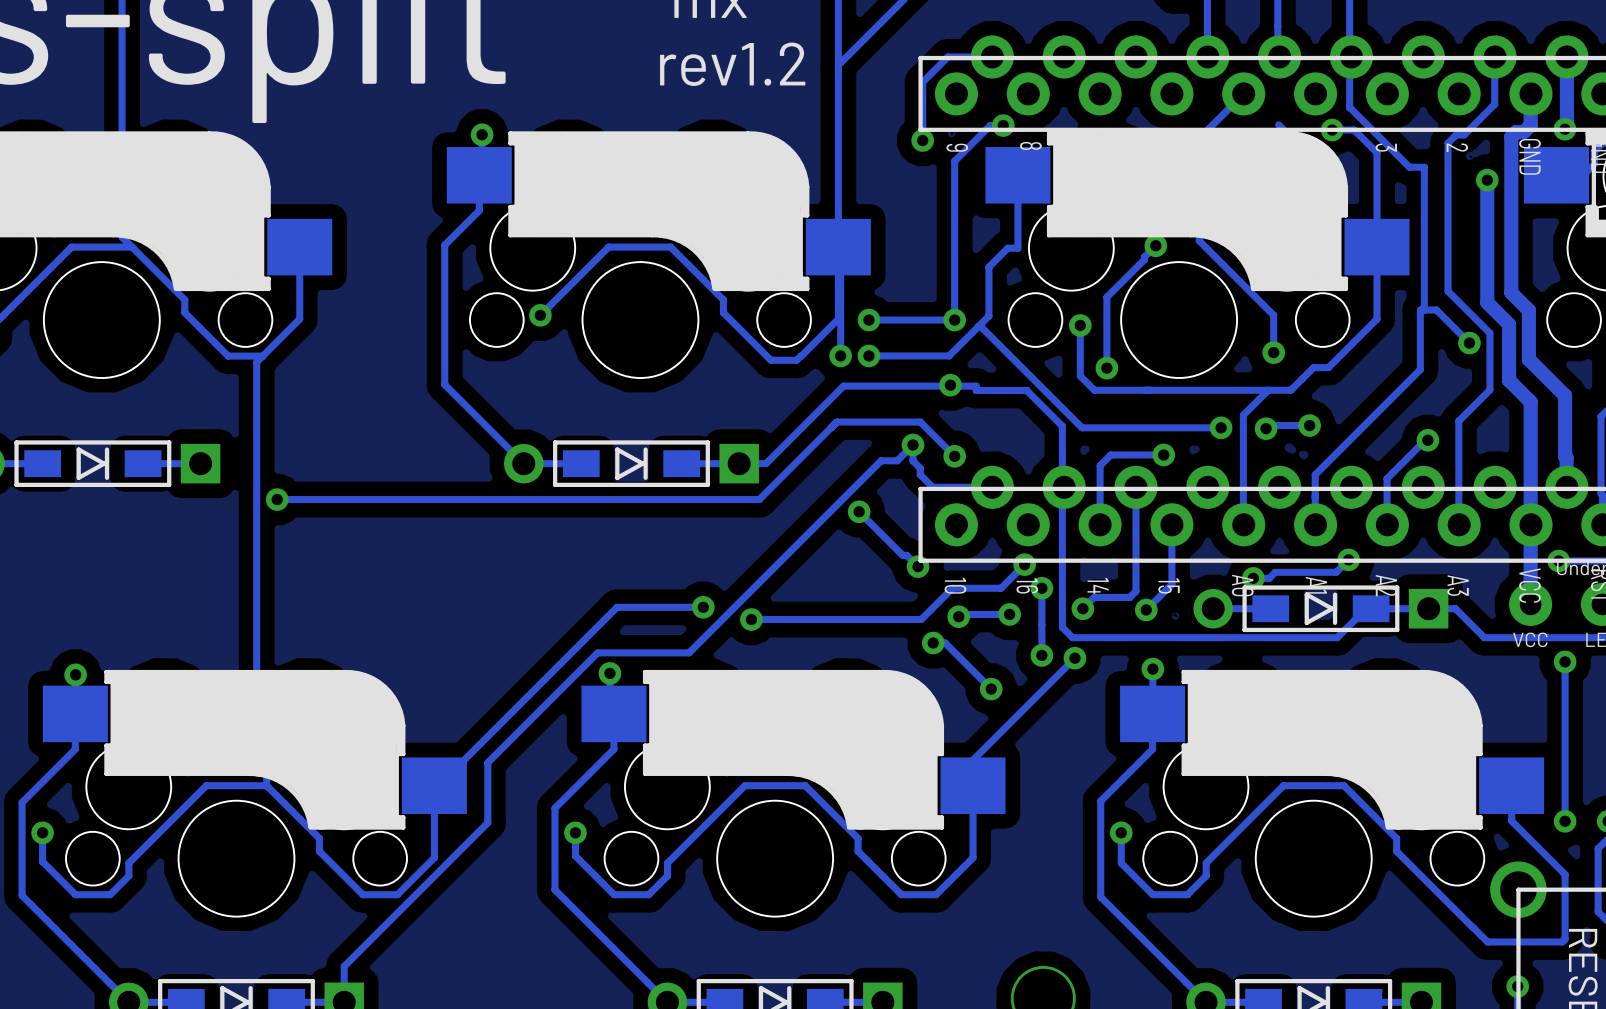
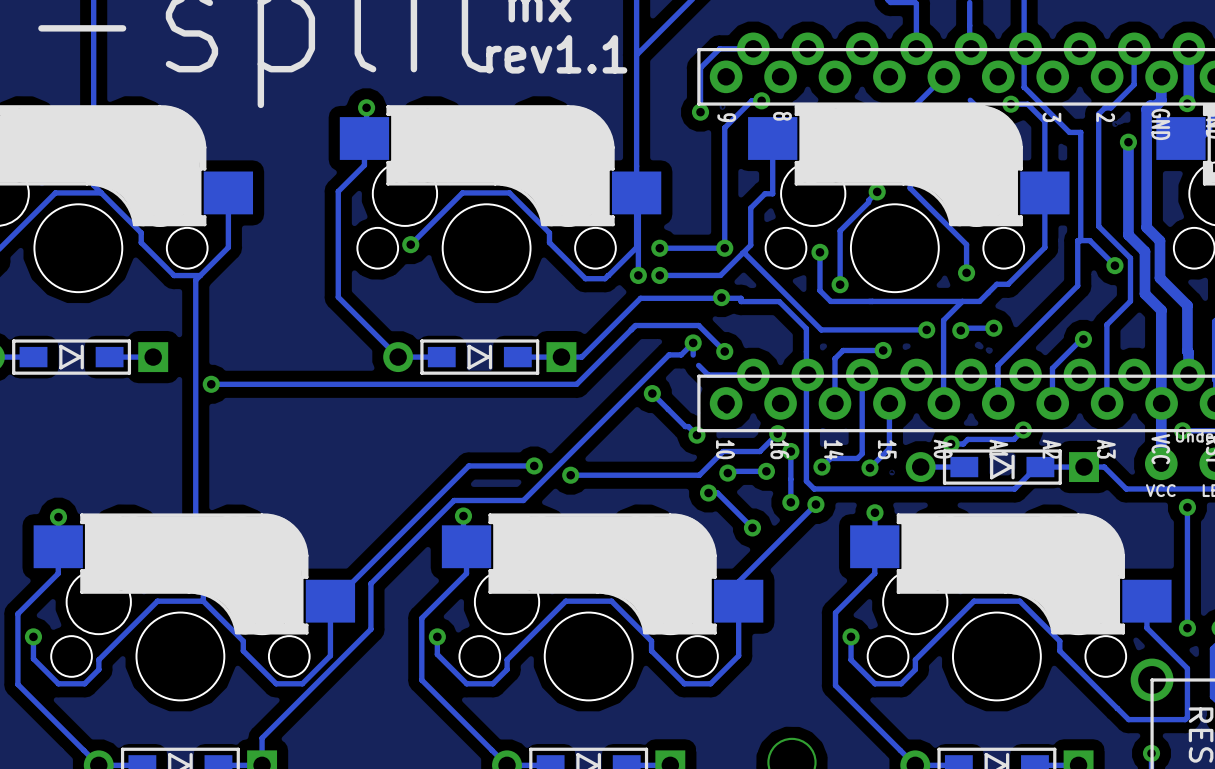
text: rev1.2 (732, 64) -> rev1.1 (556, 54)
track: (913, 461) (920, 468) (920, 474) -> none

